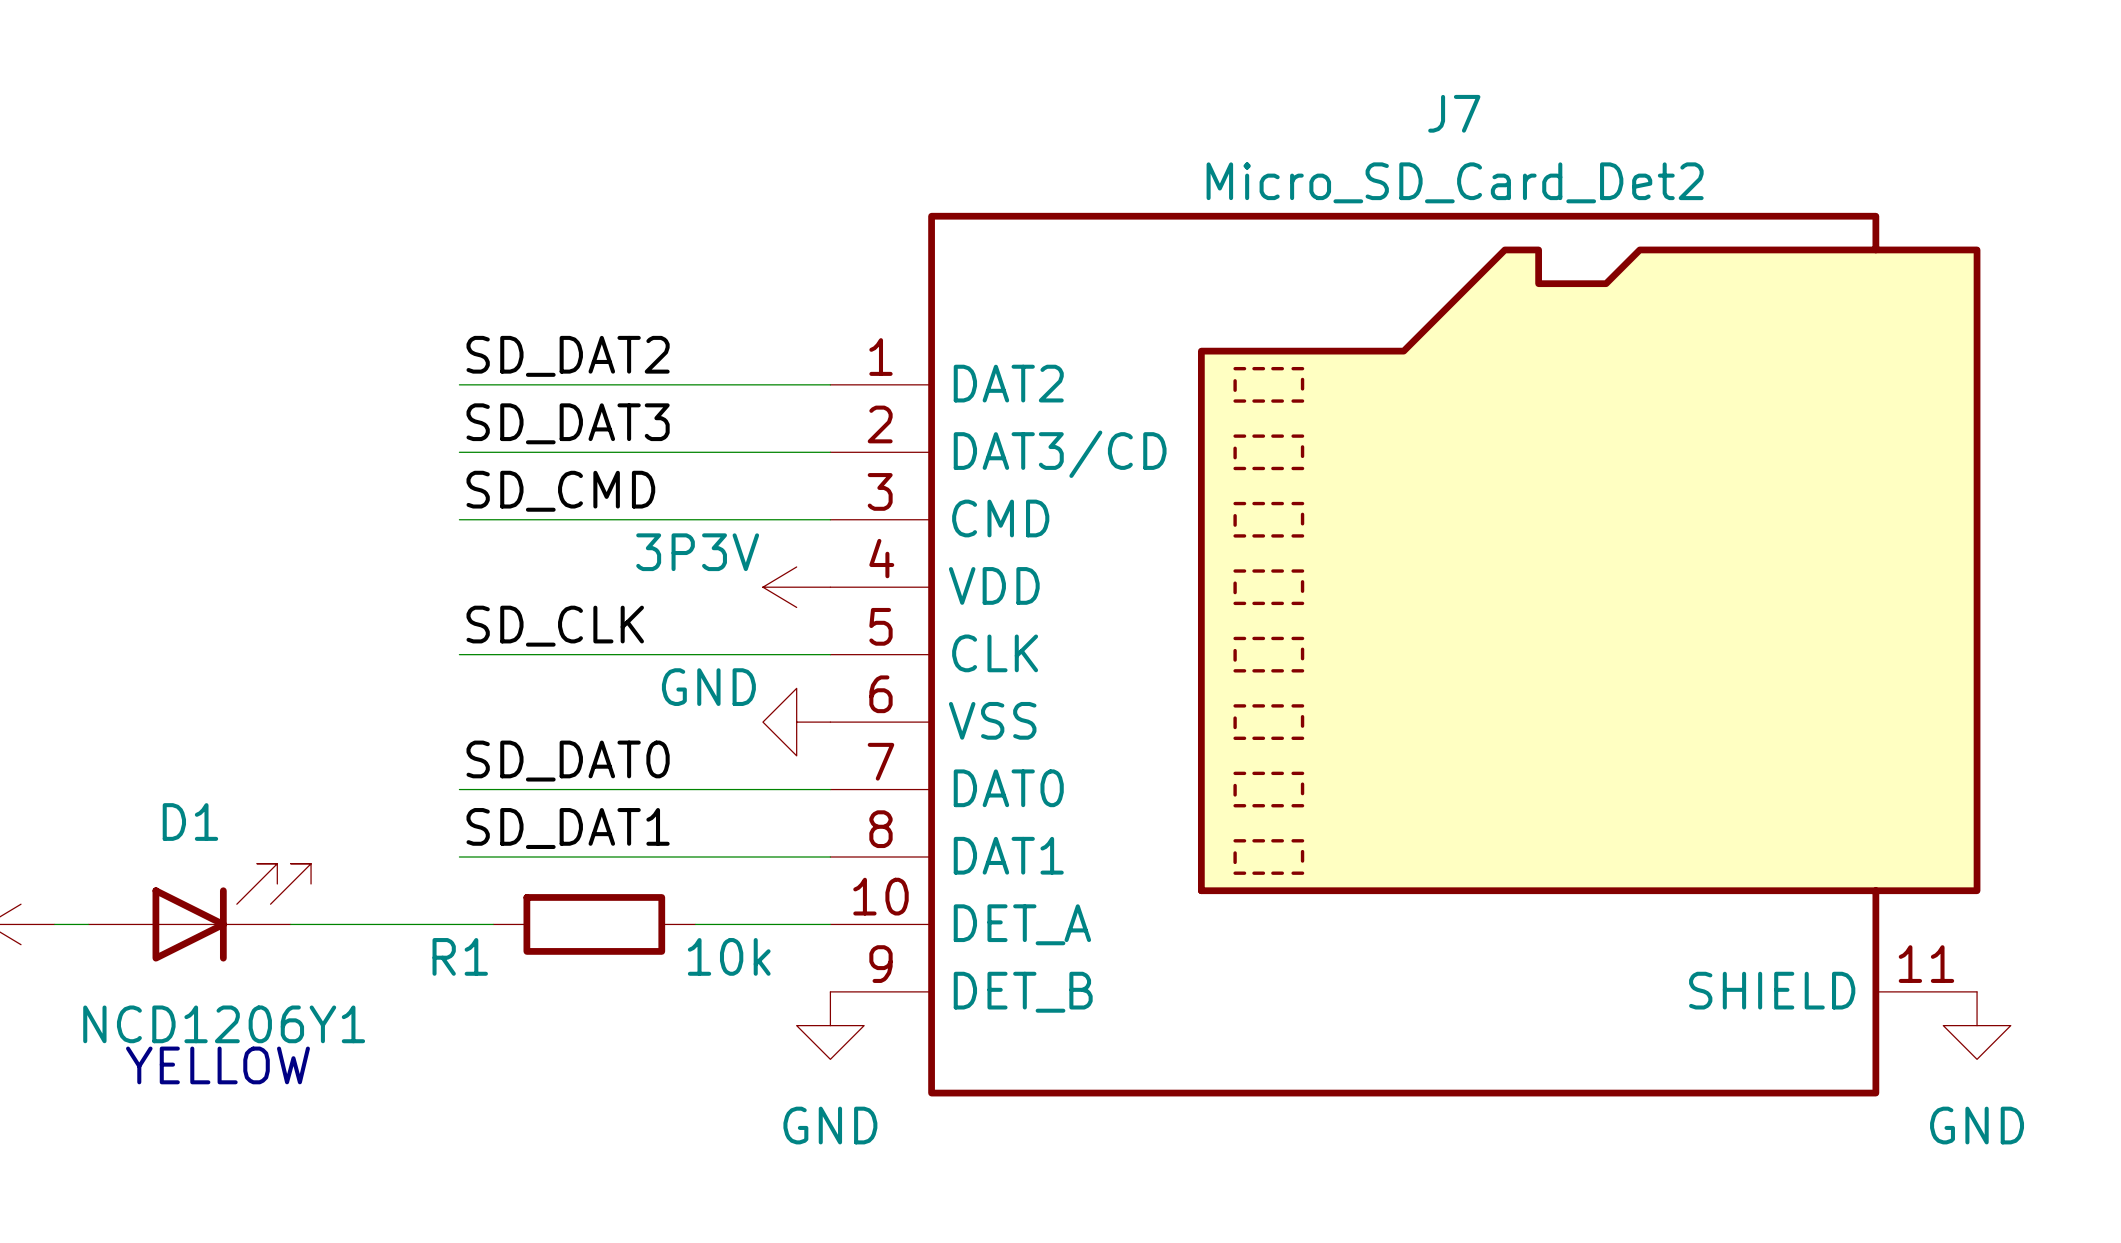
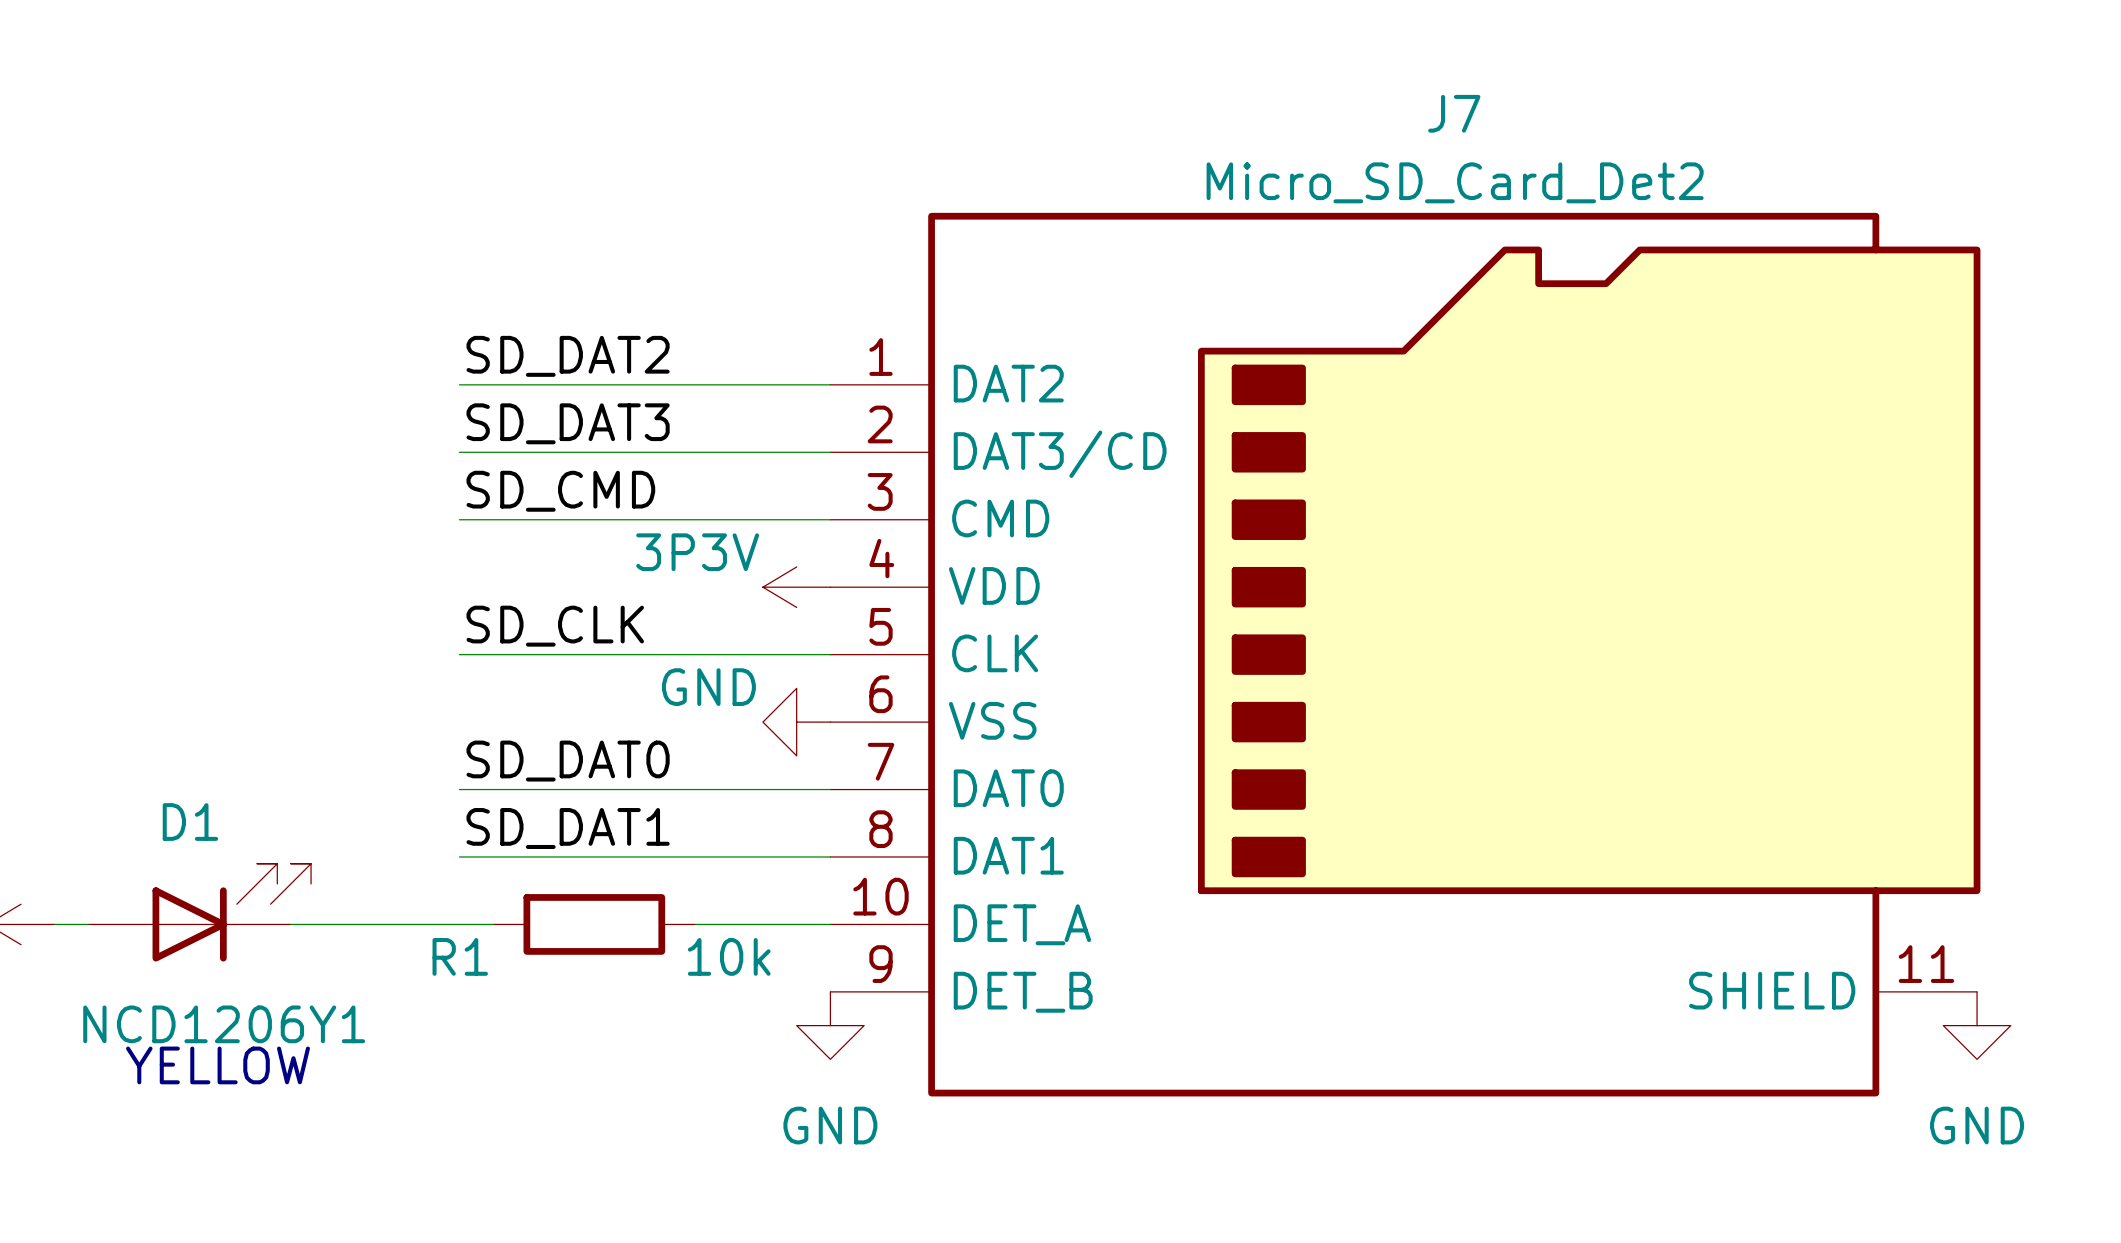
J7 symbol: [830, 212, 1981, 1097] -> [830, 212, 1981, 1097]

